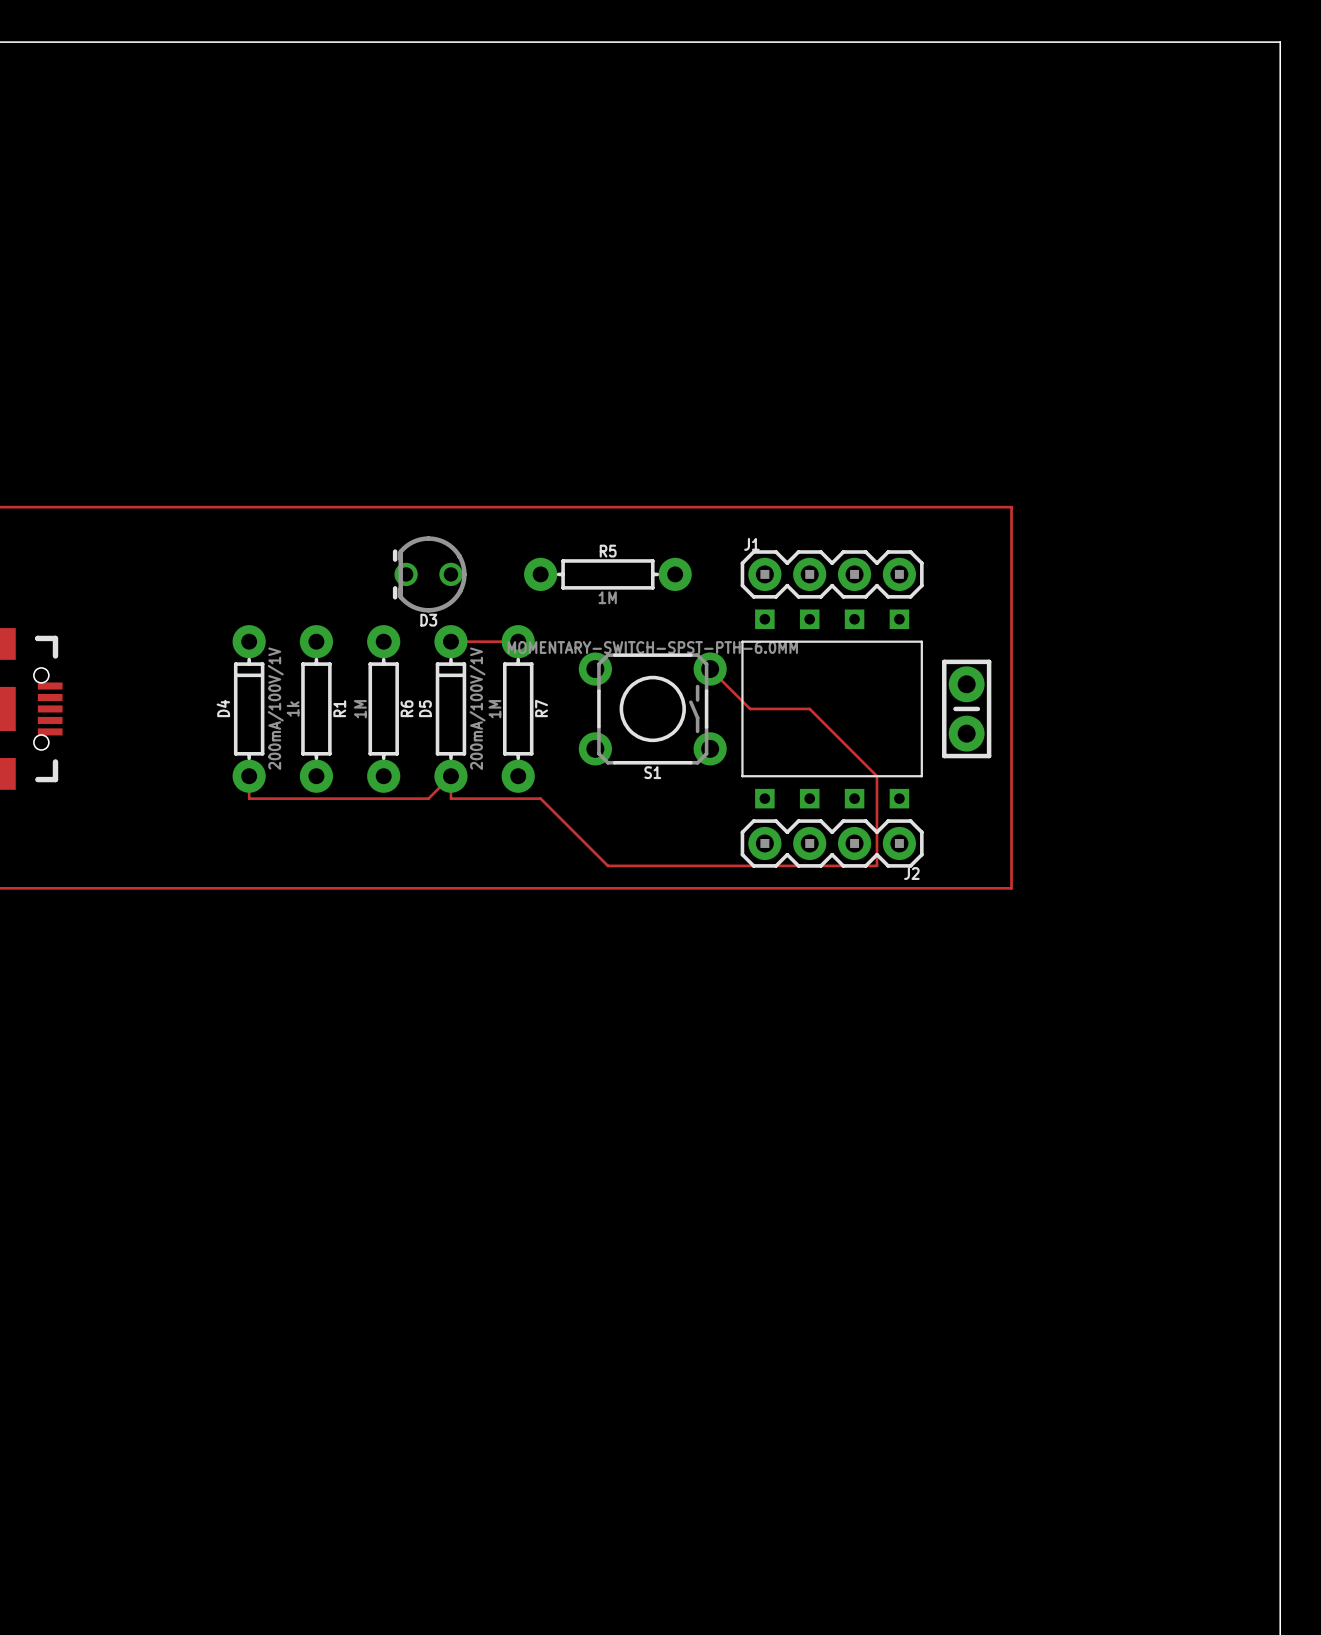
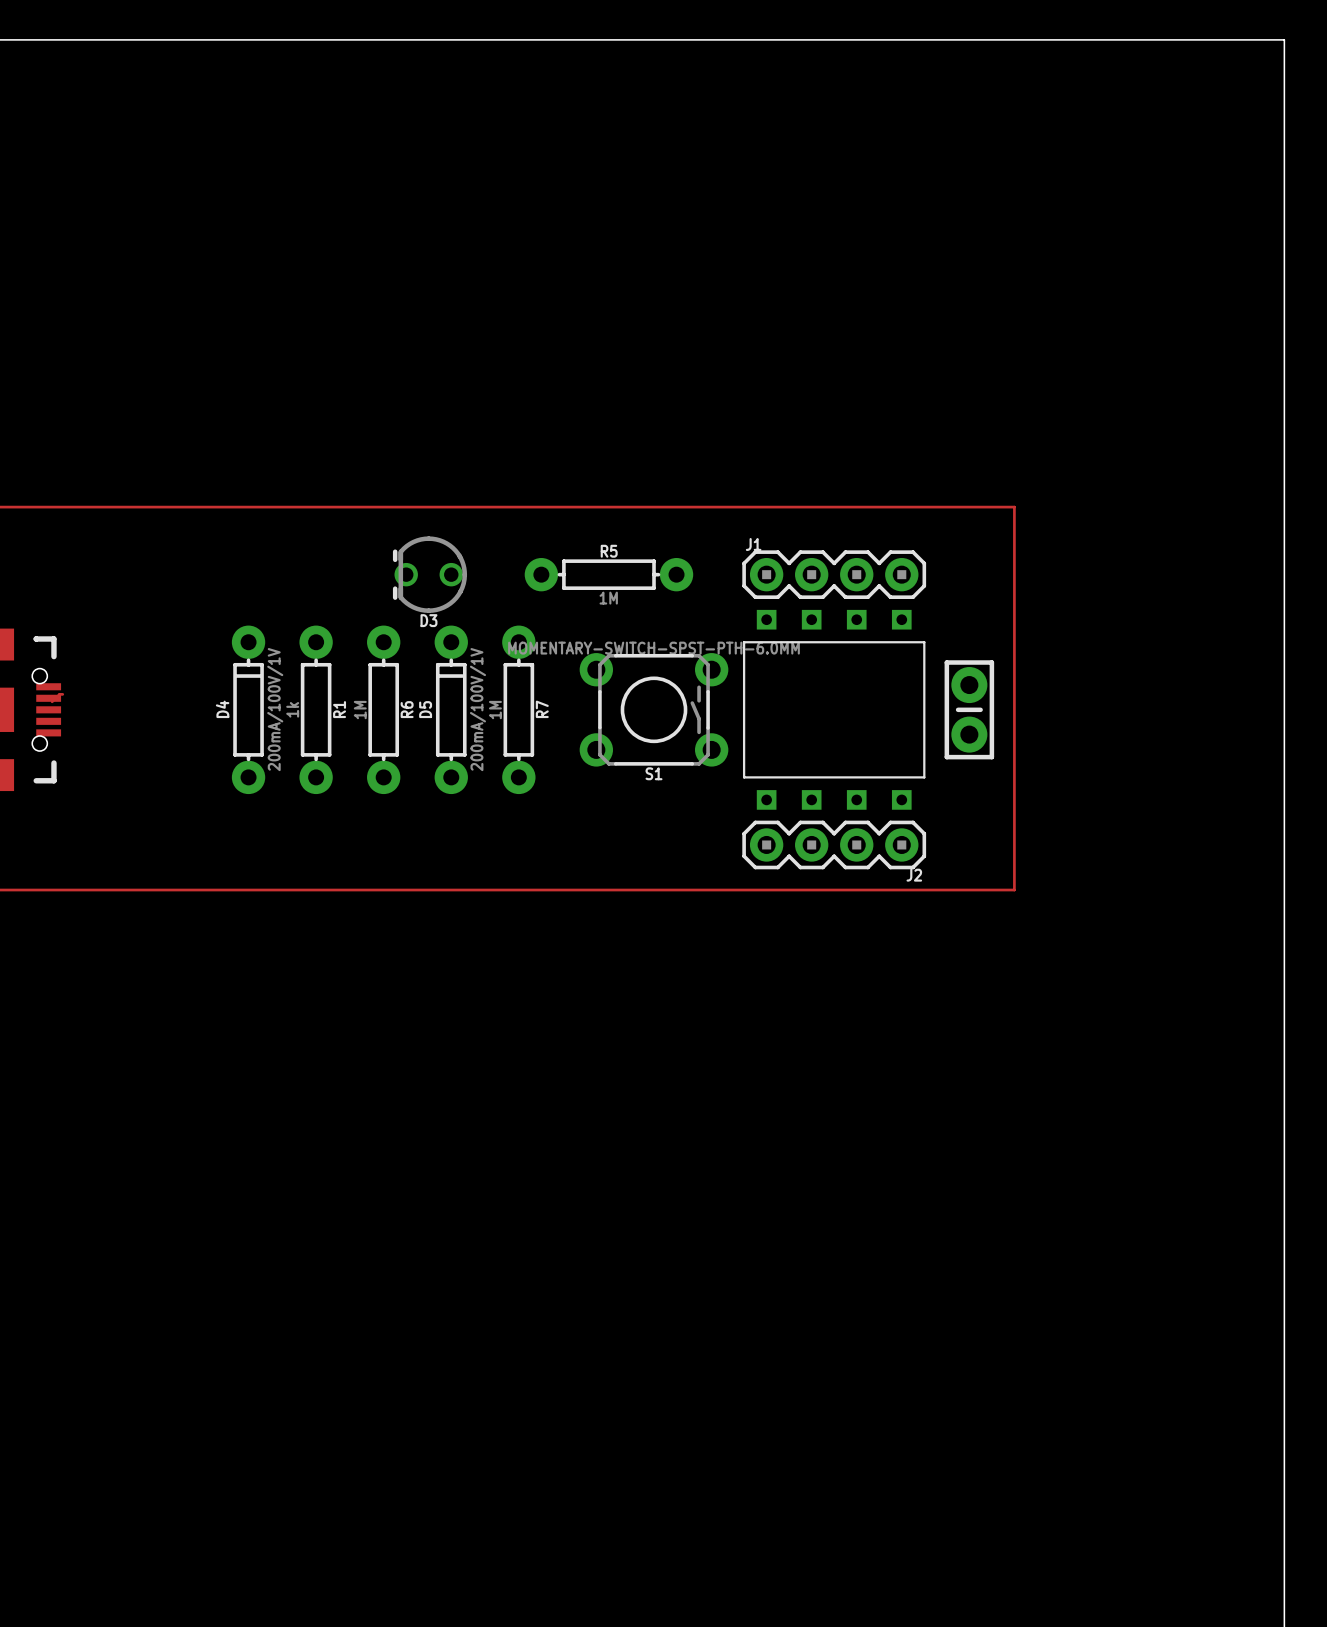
top track: (450, 641) (518, 641) -> none
top track: (710, 669) (750, 708) (809, 708) (876, 776) (876, 865) (607, 865) (540, 798) (450, 798) (450, 776) (428, 798) (249, 798) (249, 776) -> none
top track: none -> (62, 694) (59, 694) (52, 701)

